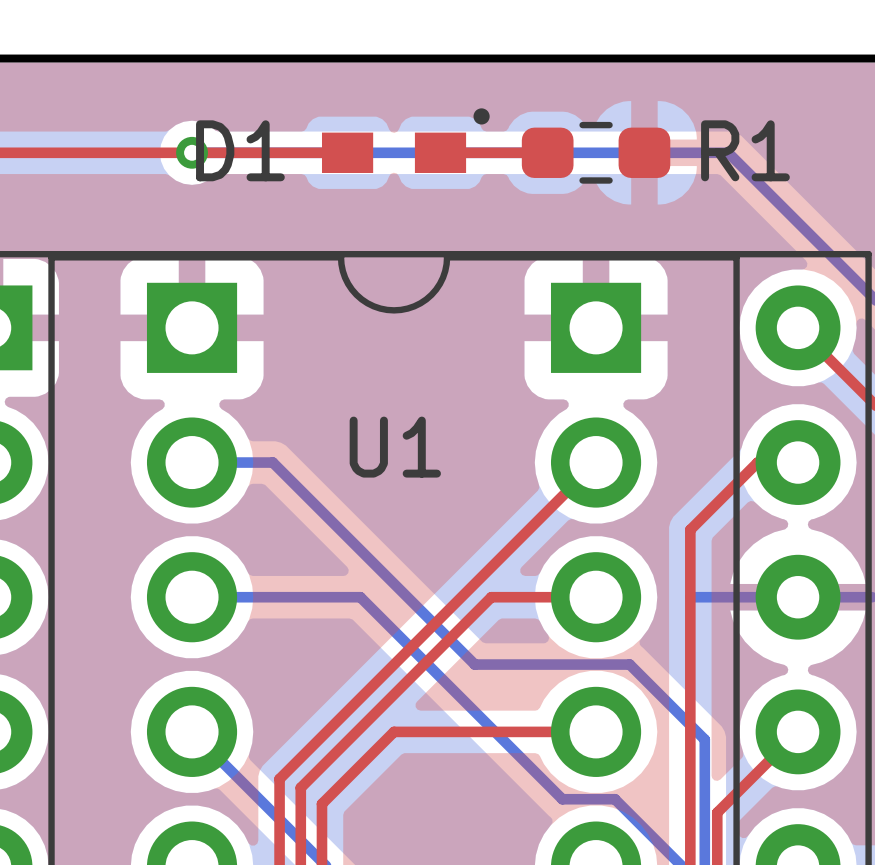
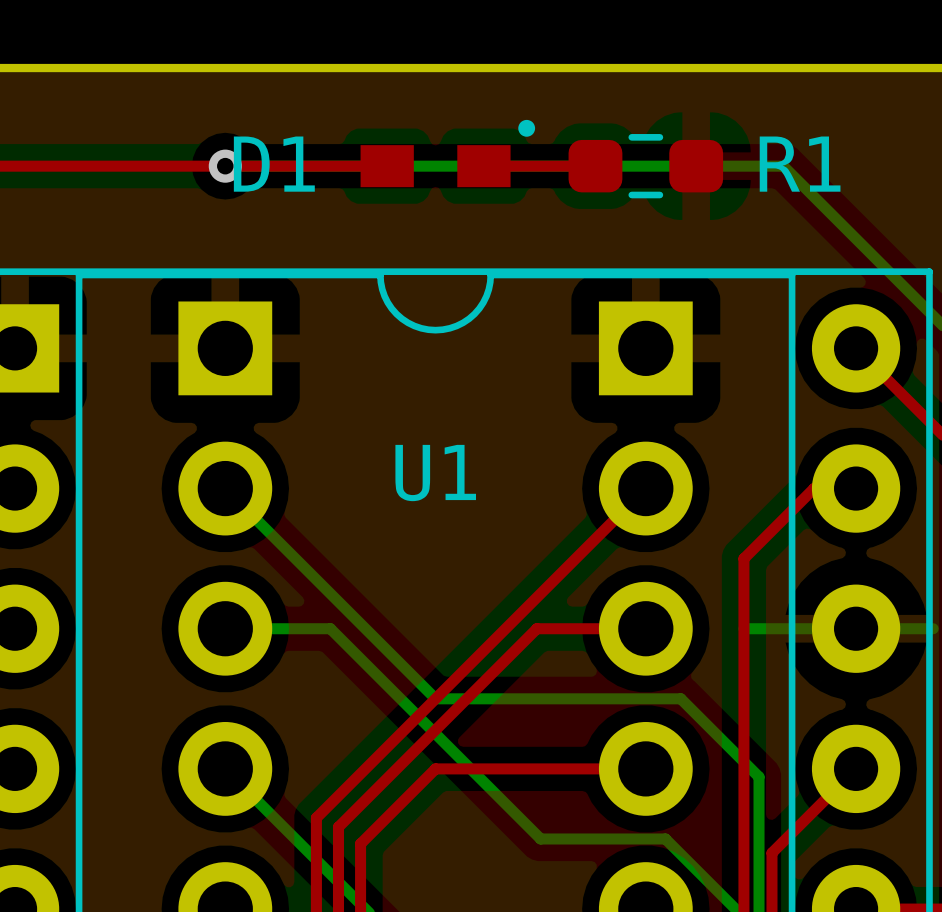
bottom track: (192, 462) (272, 462) (474, 664) -> (225, 488) (435, 698) (519, 698)
bottom track: (293, 597) (360, 597) (562, 799) -> (330, 628) (540, 838) (610, 838)

